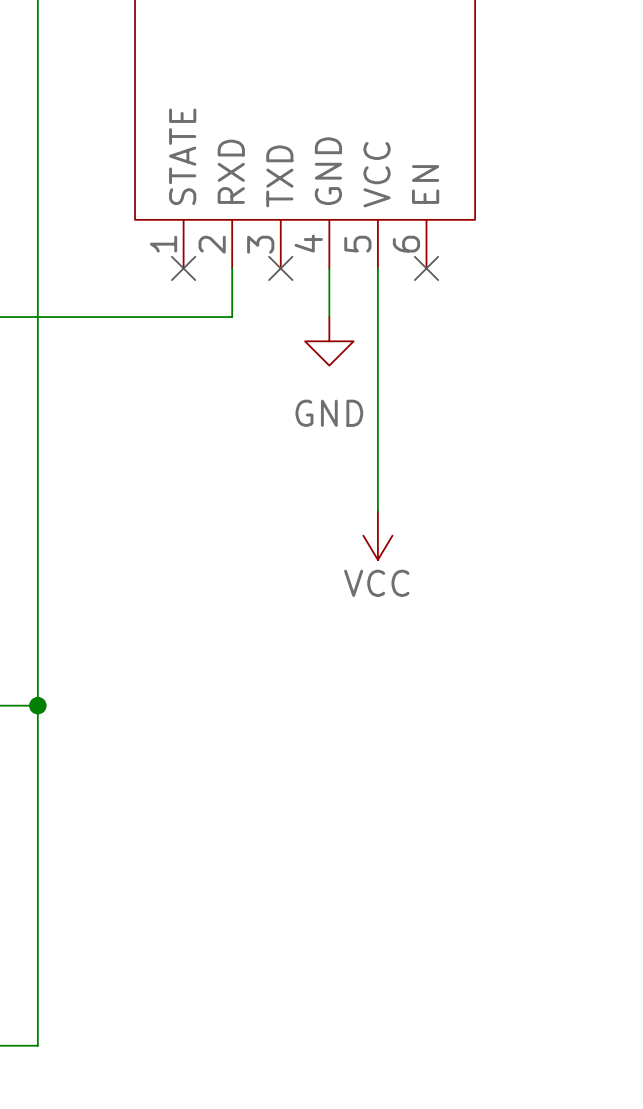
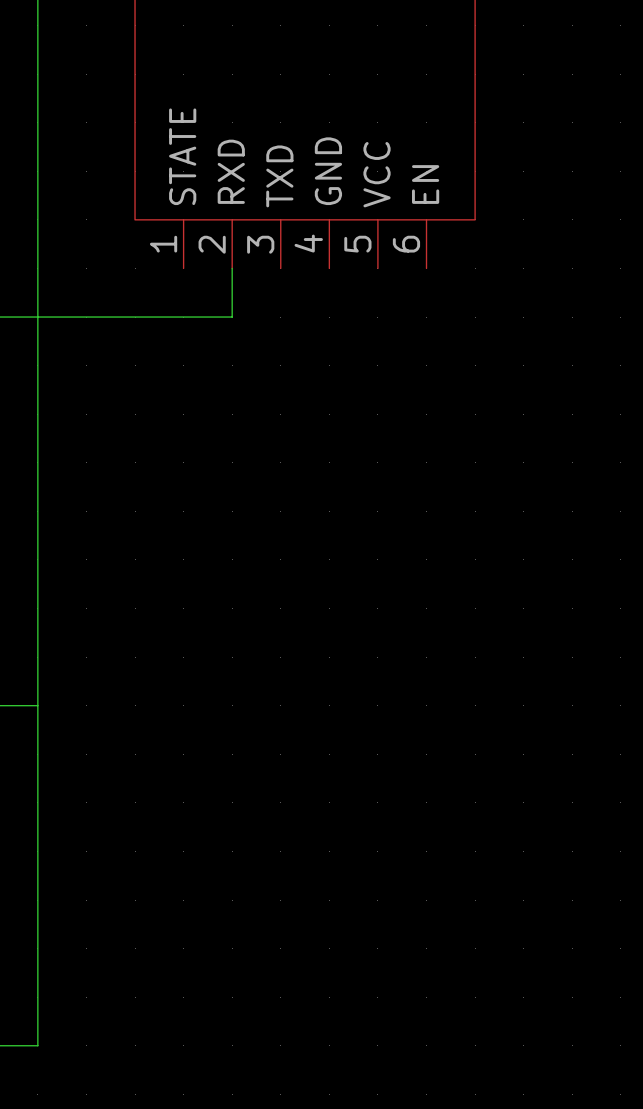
no-connect mark: (183, 268) -> none
no-connect mark: (280, 268) -> none
wire: (329, 268) (329, 317) -> none
wire: (377, 268) (377, 511) -> none
no-connect mark: (426, 268) -> none
power symbol: GND (329, 341) -> none
power symbol: VCC (377, 535) -> none
junction: (37, 705) -> none

